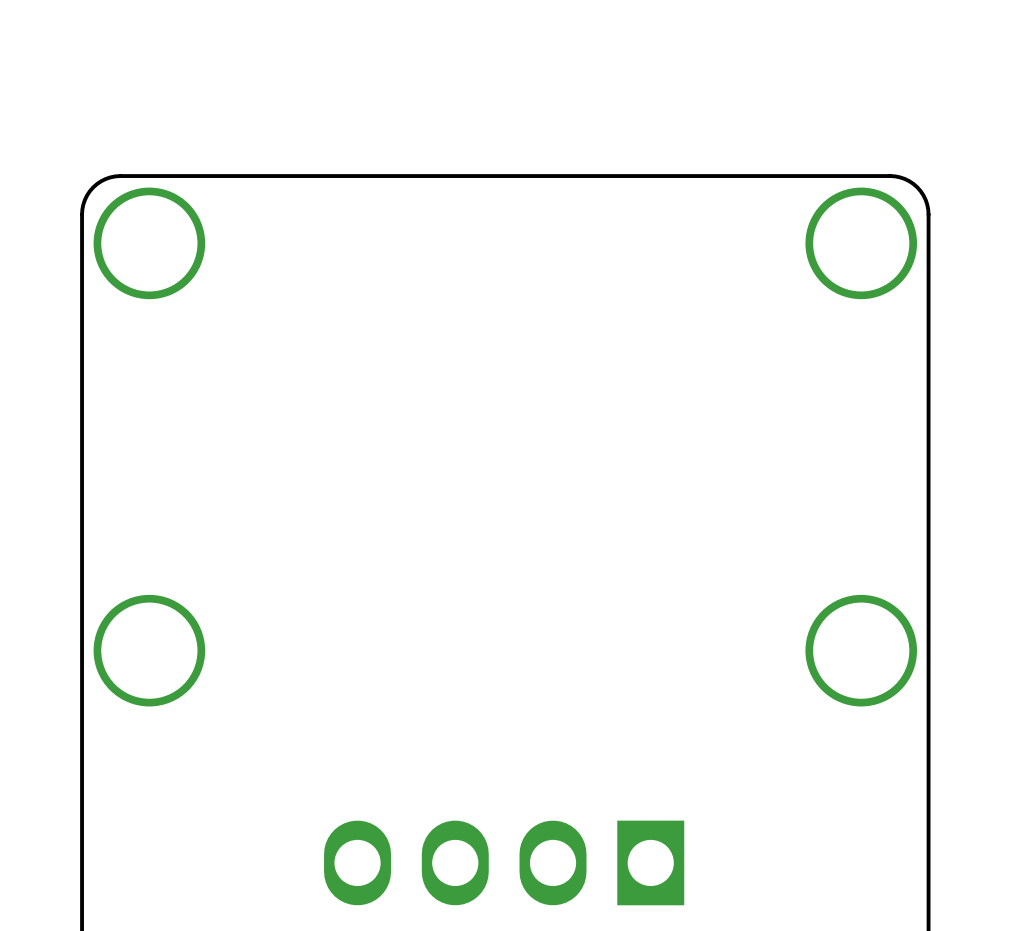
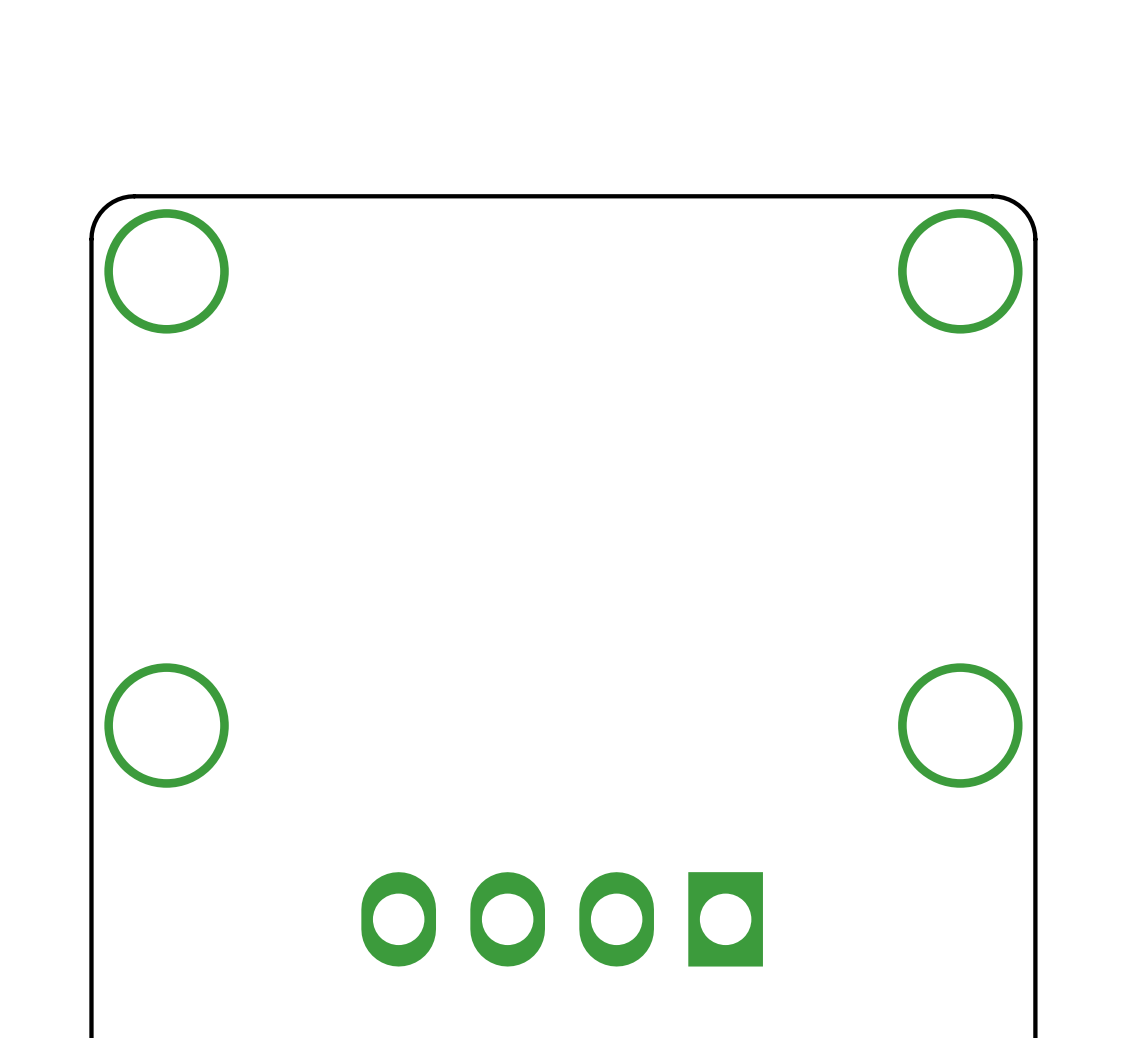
part position: (504, 862) -> (562, 919)

